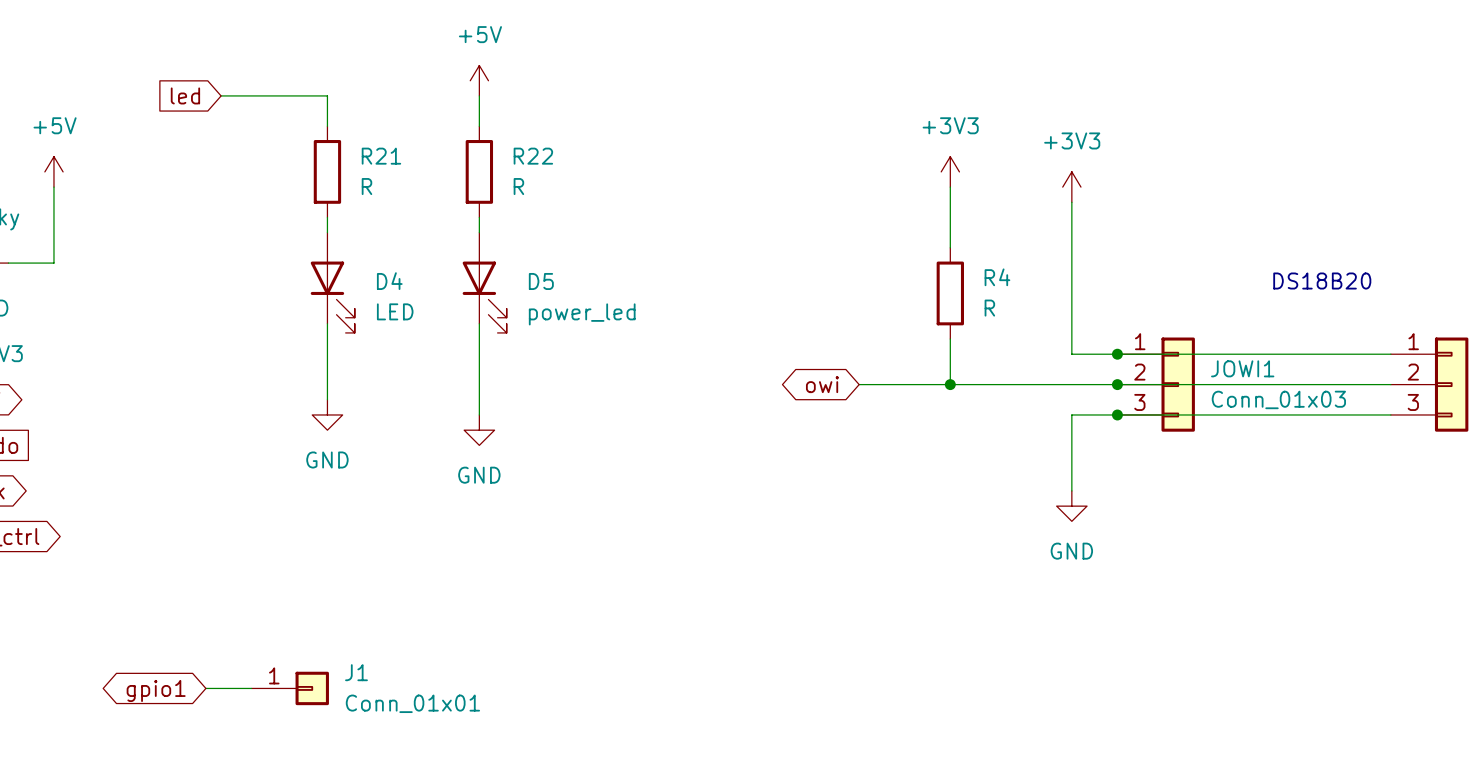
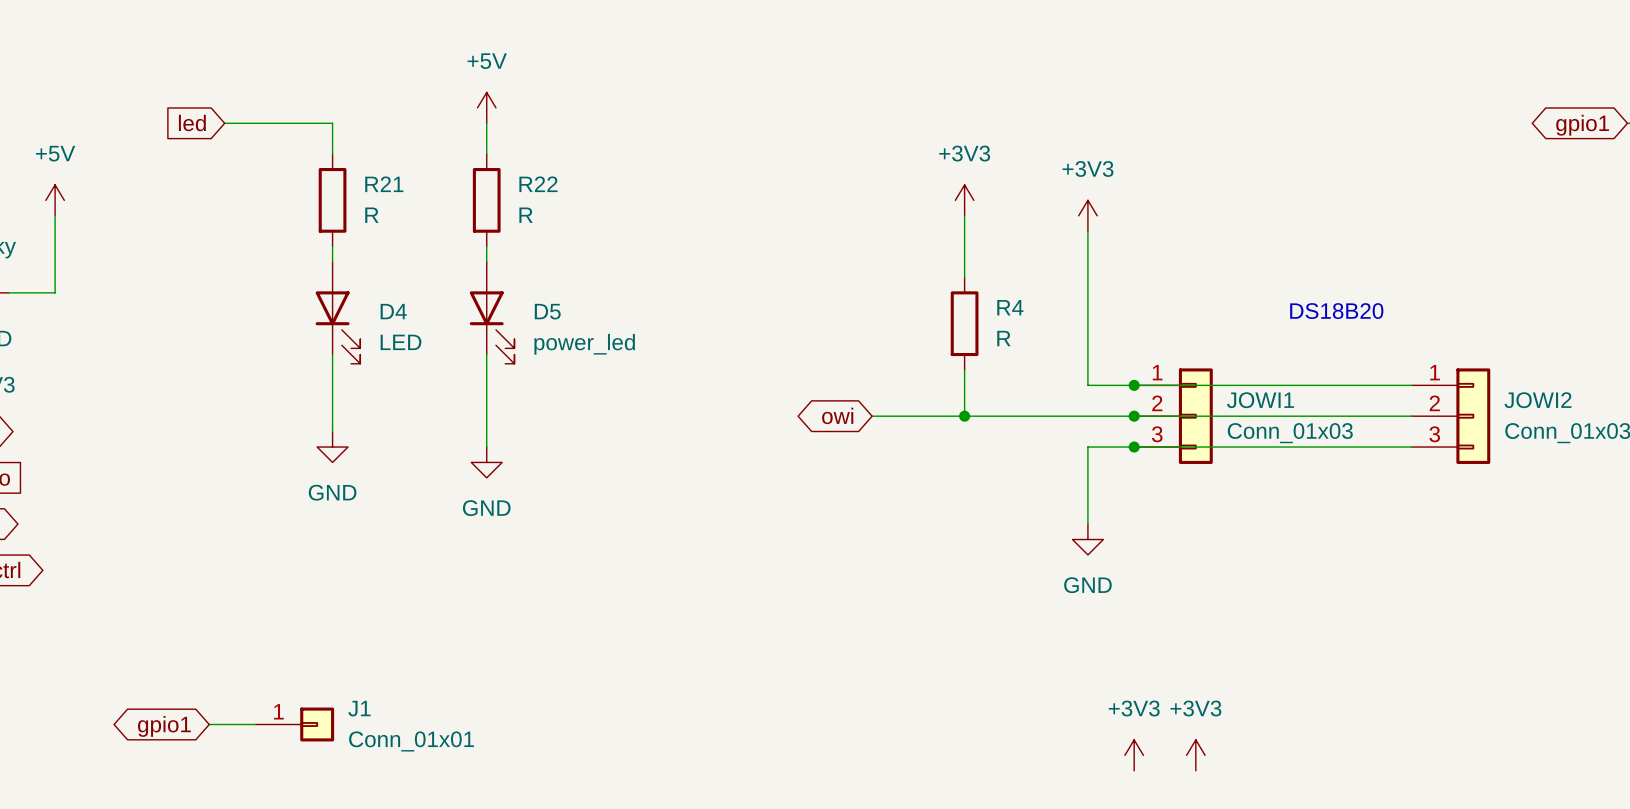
power symbol: none -> +3V3 (1134, 755)
power symbol: none -> +3V3 (1195, 755)

